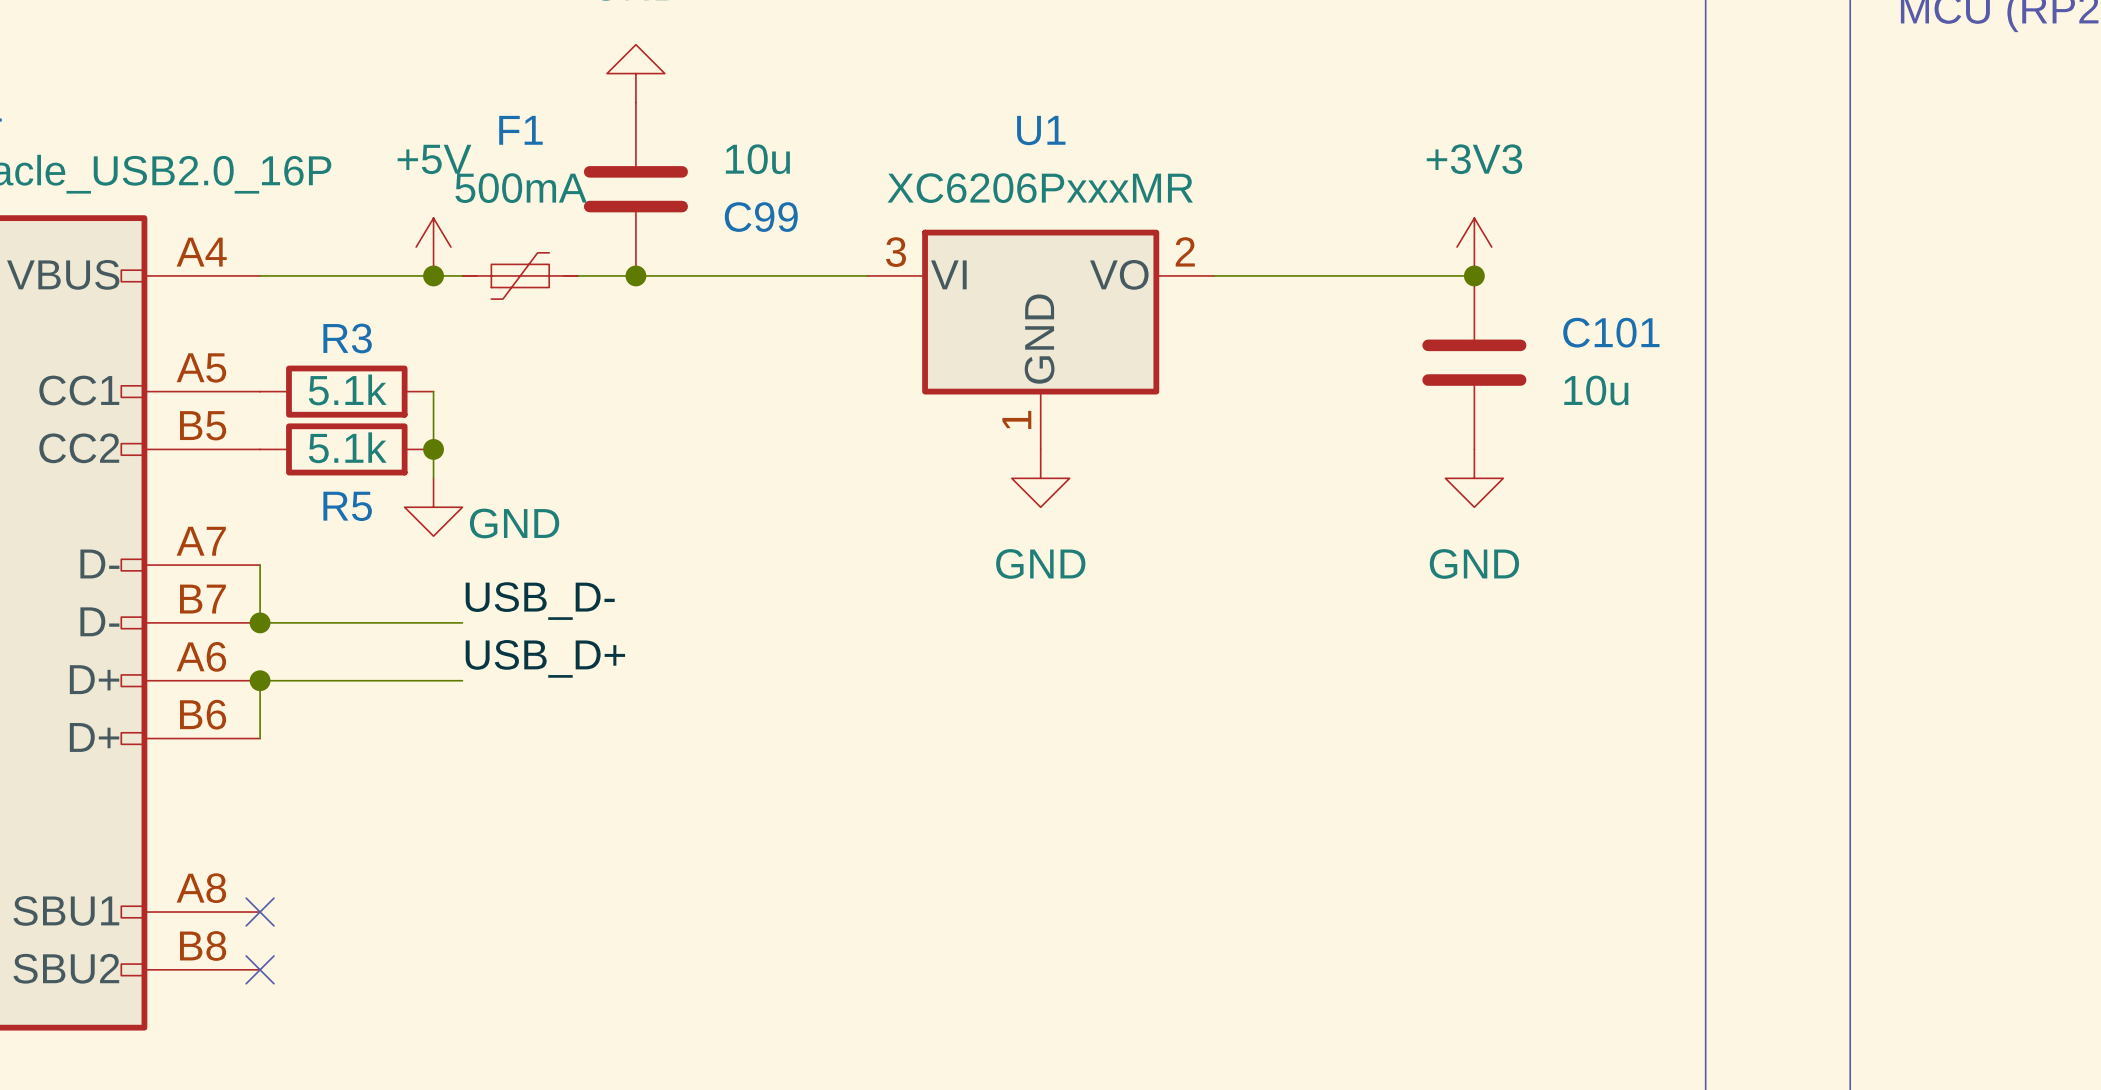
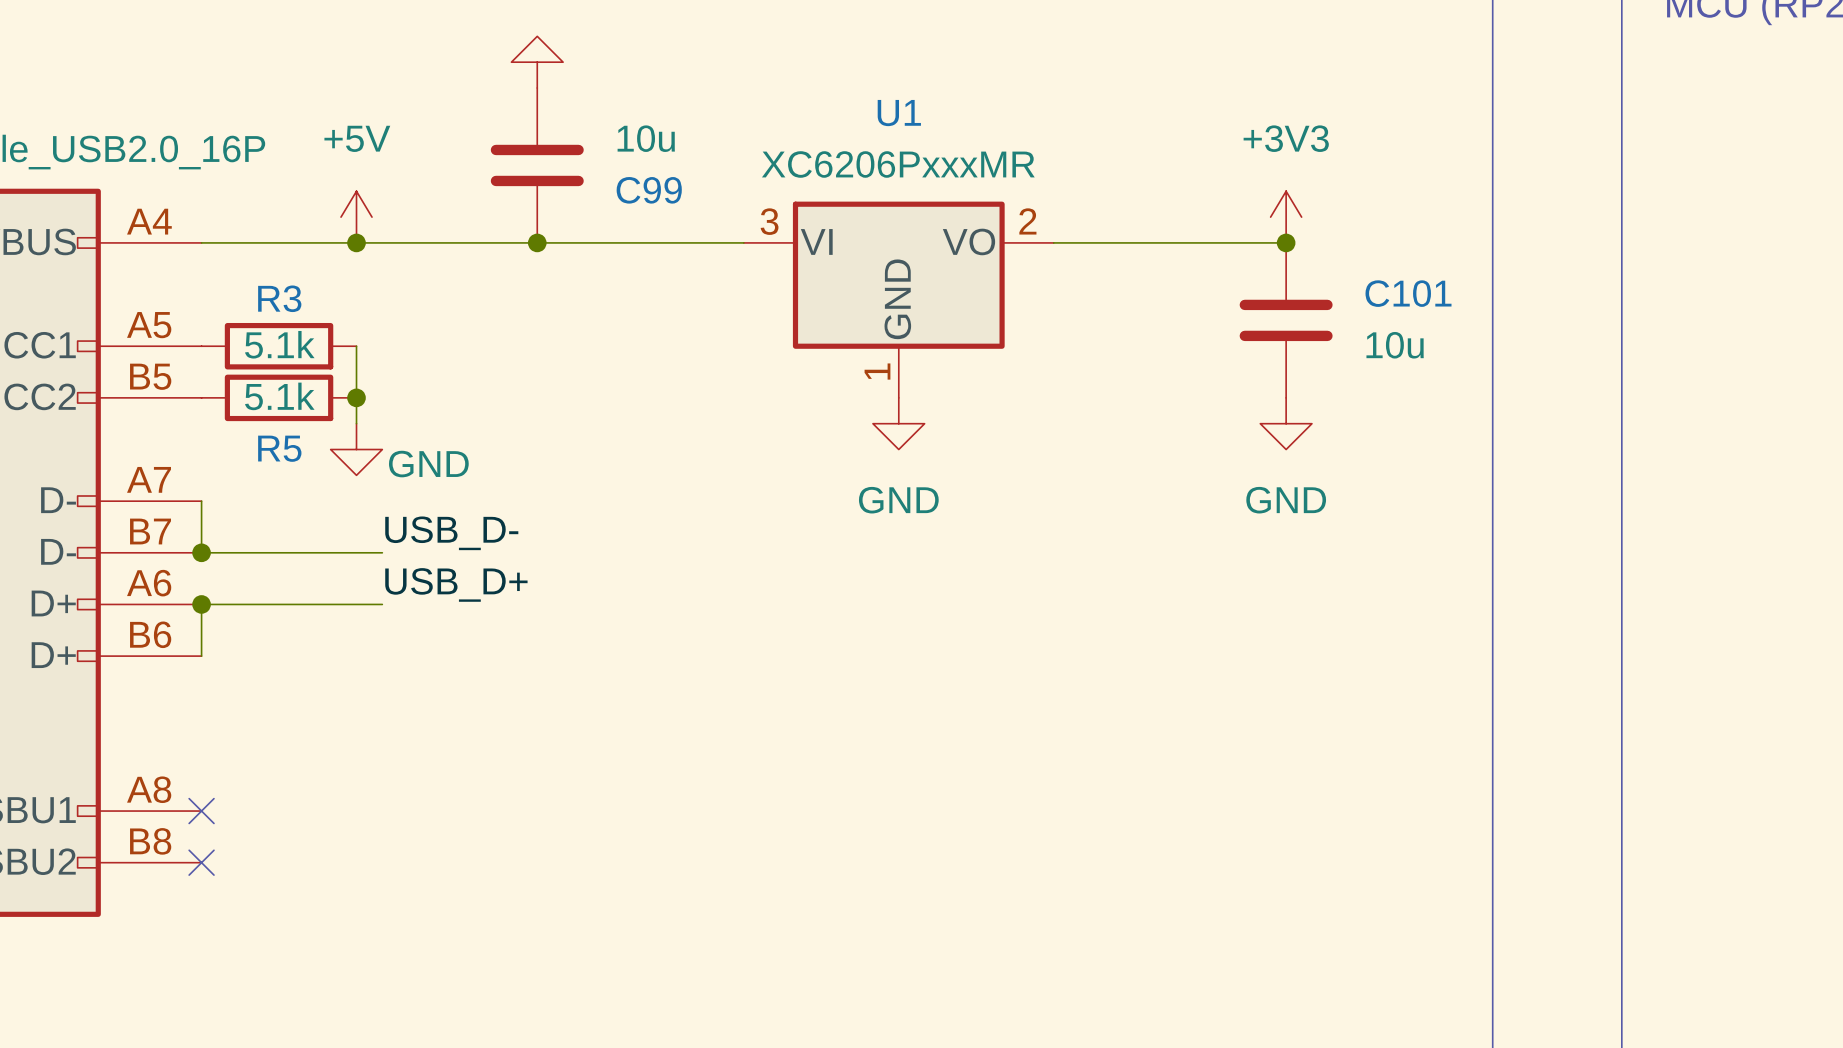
F1: 500mA (520, 275) -> none

